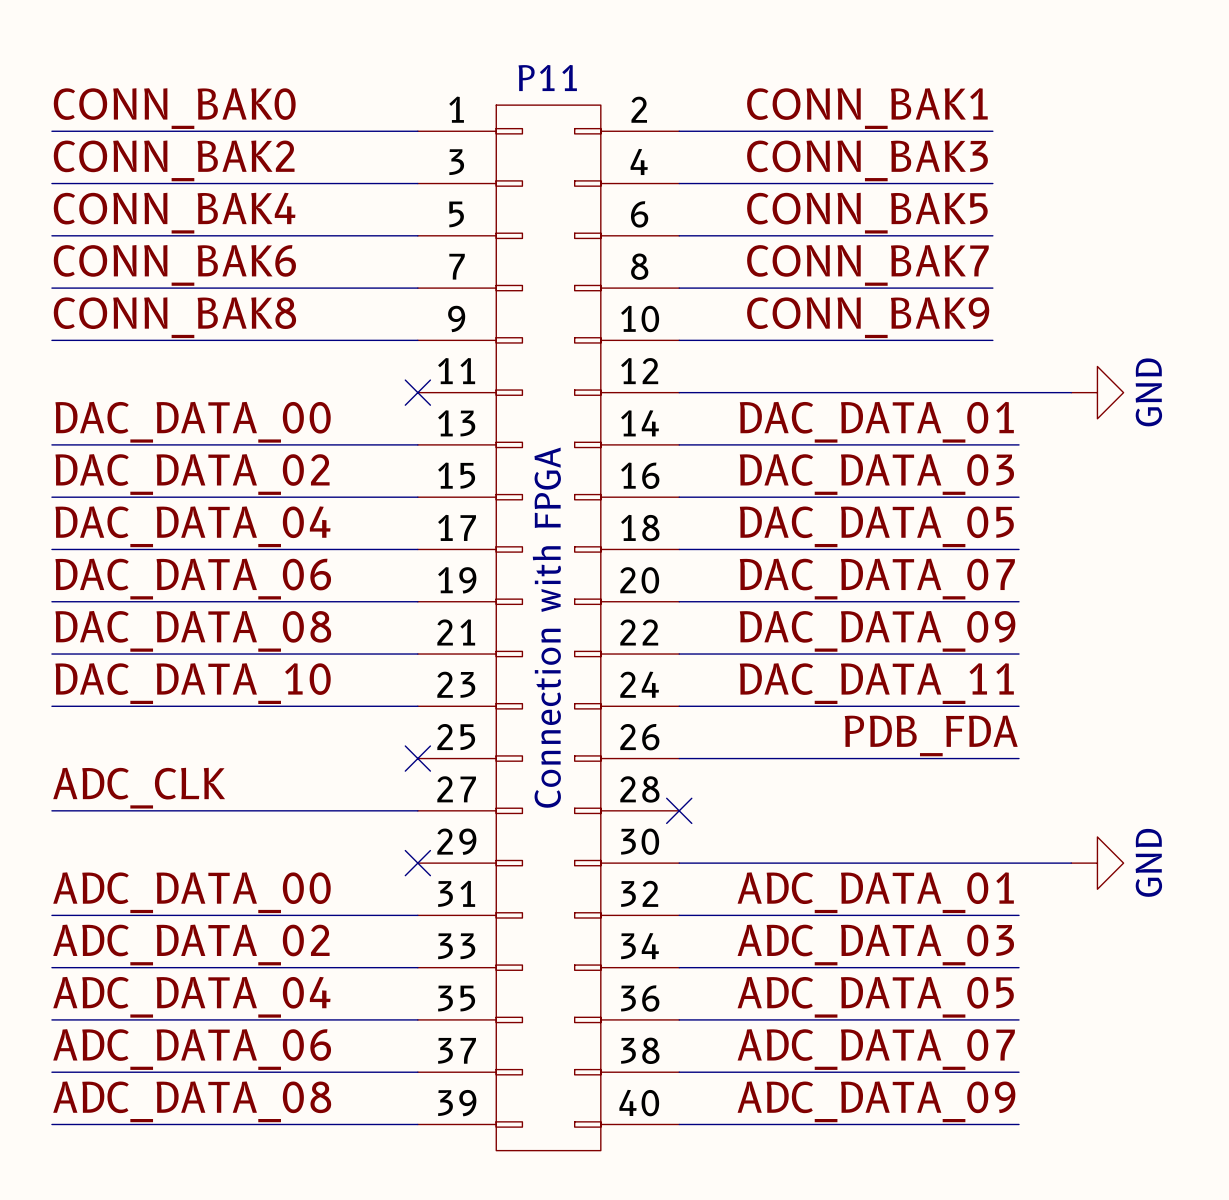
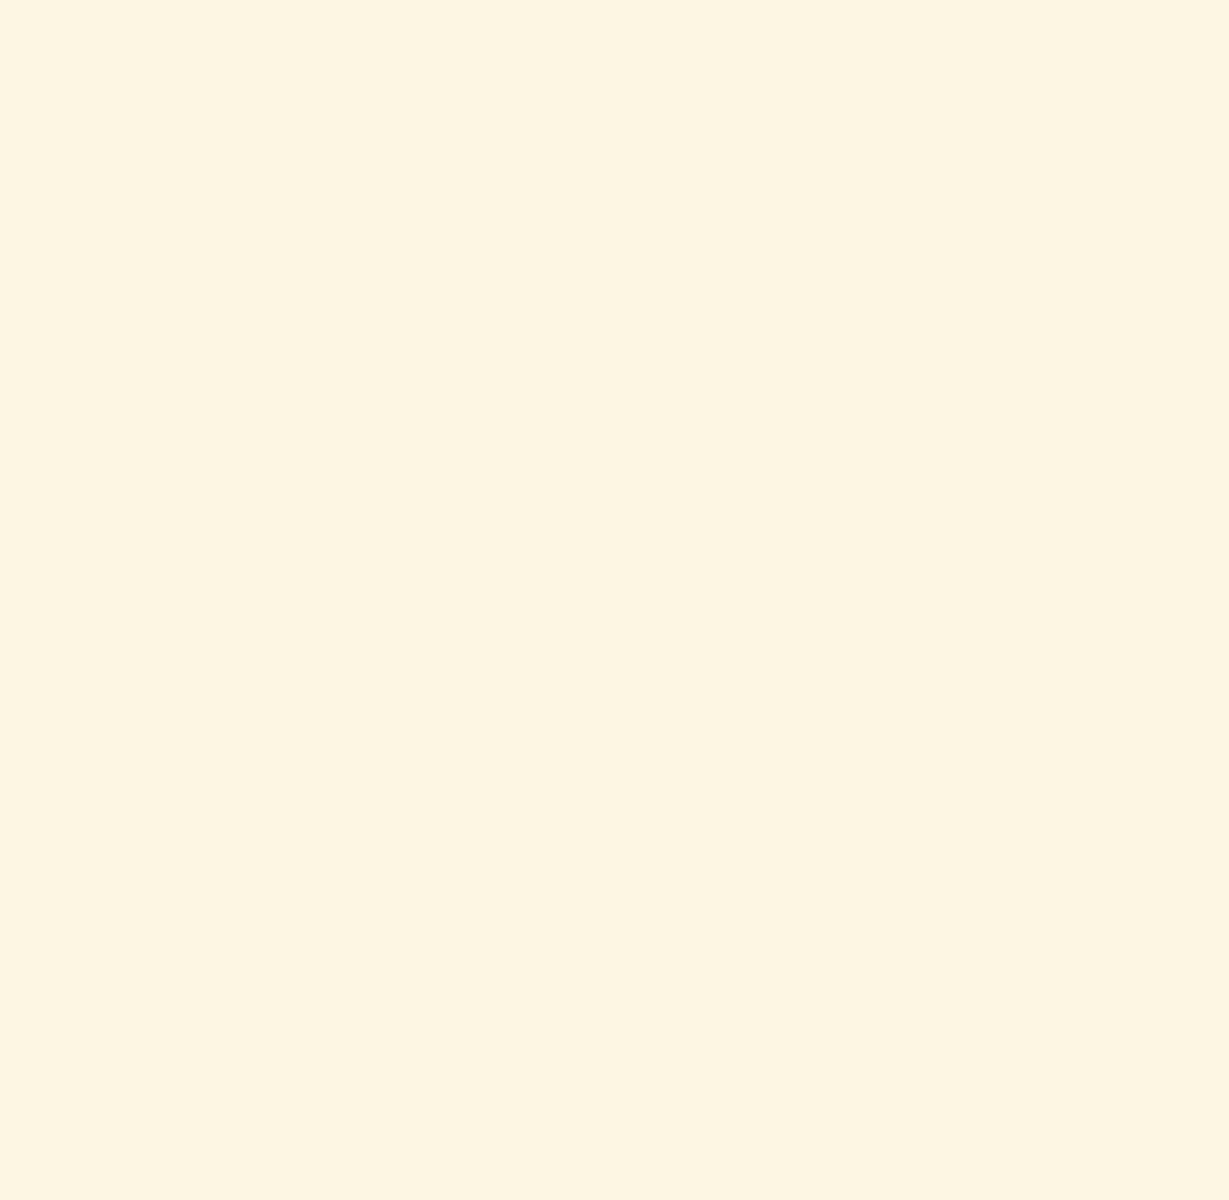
label: CONN_BAK0 (174, 108) -> none
label: CONN_BAK1 (867, 108) -> none
wire: (51, 131) (417, 131) -> none
wire: (679, 131) (992, 131) -> none
label: CONN_BAK2 (174, 160) -> none
label: CONN_BAK3 (867, 160) -> none
wire: (51, 183) (417, 183) -> none
wire: (679, 183) (992, 183) -> none
label: CONN_BAK4 (174, 213) -> none
label: CONN_BAK5 (867, 213) -> none
wire: (51, 235) (417, 235) -> none
wire: (679, 235) (992, 235) -> none
label: CONN_BAK6 (174, 265) -> none
label: CONN_BAK7 (867, 265) -> none
wire: (51, 288) (417, 288) -> none
wire: (679, 288) (992, 288) -> none
label: CONN_BAK8 (174, 317) -> none
label: CONN_BAK9 (868, 317) -> none
wire: (51, 340) (417, 340) -> none
wire: (679, 340) (992, 340) -> none
no-connect mark: (417, 392) -> none
wire: (679, 392) (1071, 392) -> none
power symbol: GND (1097, 392) -> none
label: DAC_DATA_00 (193, 422) -> none
label: DAC_DATA_01 (876, 422) -> none
wire: (51, 444) (417, 444) -> none
wire: (679, 444) (1019, 444) -> none
label: DAC_DATA_02 (192, 474) -> none
label: DAC_DATA_03 (876, 474) -> none
wire: (51, 497) (417, 497) -> none
wire: (679, 497) (1019, 497) -> none
label: DAC_DATA_04 (192, 526) -> none
label: DAC_DATA_05 (876, 526) -> none
wire: (51, 549) (417, 549) -> none
wire: (679, 549) (1019, 549) -> none
label: DAC_DATA_06 (193, 579) -> none
label: DAC_DATA_07 (877, 579) -> none
wire: (51, 601) (417, 601) -> none
wire: (679, 601) (1019, 601) -> none
P11: Connection with FPGA (548, 627) -> none
label: DAC_DATA_08 (193, 631) -> none
label: DAC_DATA_09 (877, 631) -> none
wire: (51, 654) (417, 654) -> none
wire: (679, 654) (1019, 654) -> none
label: DAC_DATA_10 (193, 683) -> none
label: DAC_DATA_11 (876, 683) -> none
wire: (51, 706) (417, 706) -> none
wire: (679, 706) (1019, 706) -> none
label: PDB_FDA (931, 735) -> none
no-connect mark: (417, 758) -> none
wire: (679, 758) (1019, 758) -> none
label: ADC_CLK (139, 788) -> none
wire: (51, 810) (417, 810) -> none
no-connect mark: (679, 810) -> none
no-connect mark: (417, 863) -> none
wire: (679, 863) (1071, 863) -> none
power symbol: GND (1097, 863) -> none
label: ADC_DATA_00 (191, 892) -> none
label: ADC_DATA_01 (875, 892) -> none
wire: (51, 915) (417, 915) -> none
wire: (679, 915) (1019, 915) -> none
label: ADC_DATA_02 (191, 944) -> none
label: ADC_DATA_03 (875, 944) -> none
wire: (51, 967) (417, 967) -> none
wire: (679, 967) (1019, 967) -> none
label: ADC_DATA_04 (191, 997) -> none
label: ADC_DATA_05 (875, 997) -> none
wire: (51, 1019) (417, 1019) -> none
wire: (679, 1019) (1019, 1019) -> none
label: ADC_DATA_06 (192, 1049) -> none
label: ADC_DATA_07 (876, 1049) -> none
wire: (51, 1072) (417, 1072) -> none
wire: (679, 1072) (1019, 1072) -> none
label: ADC_DATA_08 (192, 1101) -> none
label: ADC_DATA_09 (876, 1101) -> none
wire: (51, 1124) (417, 1124) -> none
wire: (679, 1124) (1019, 1124) -> none

